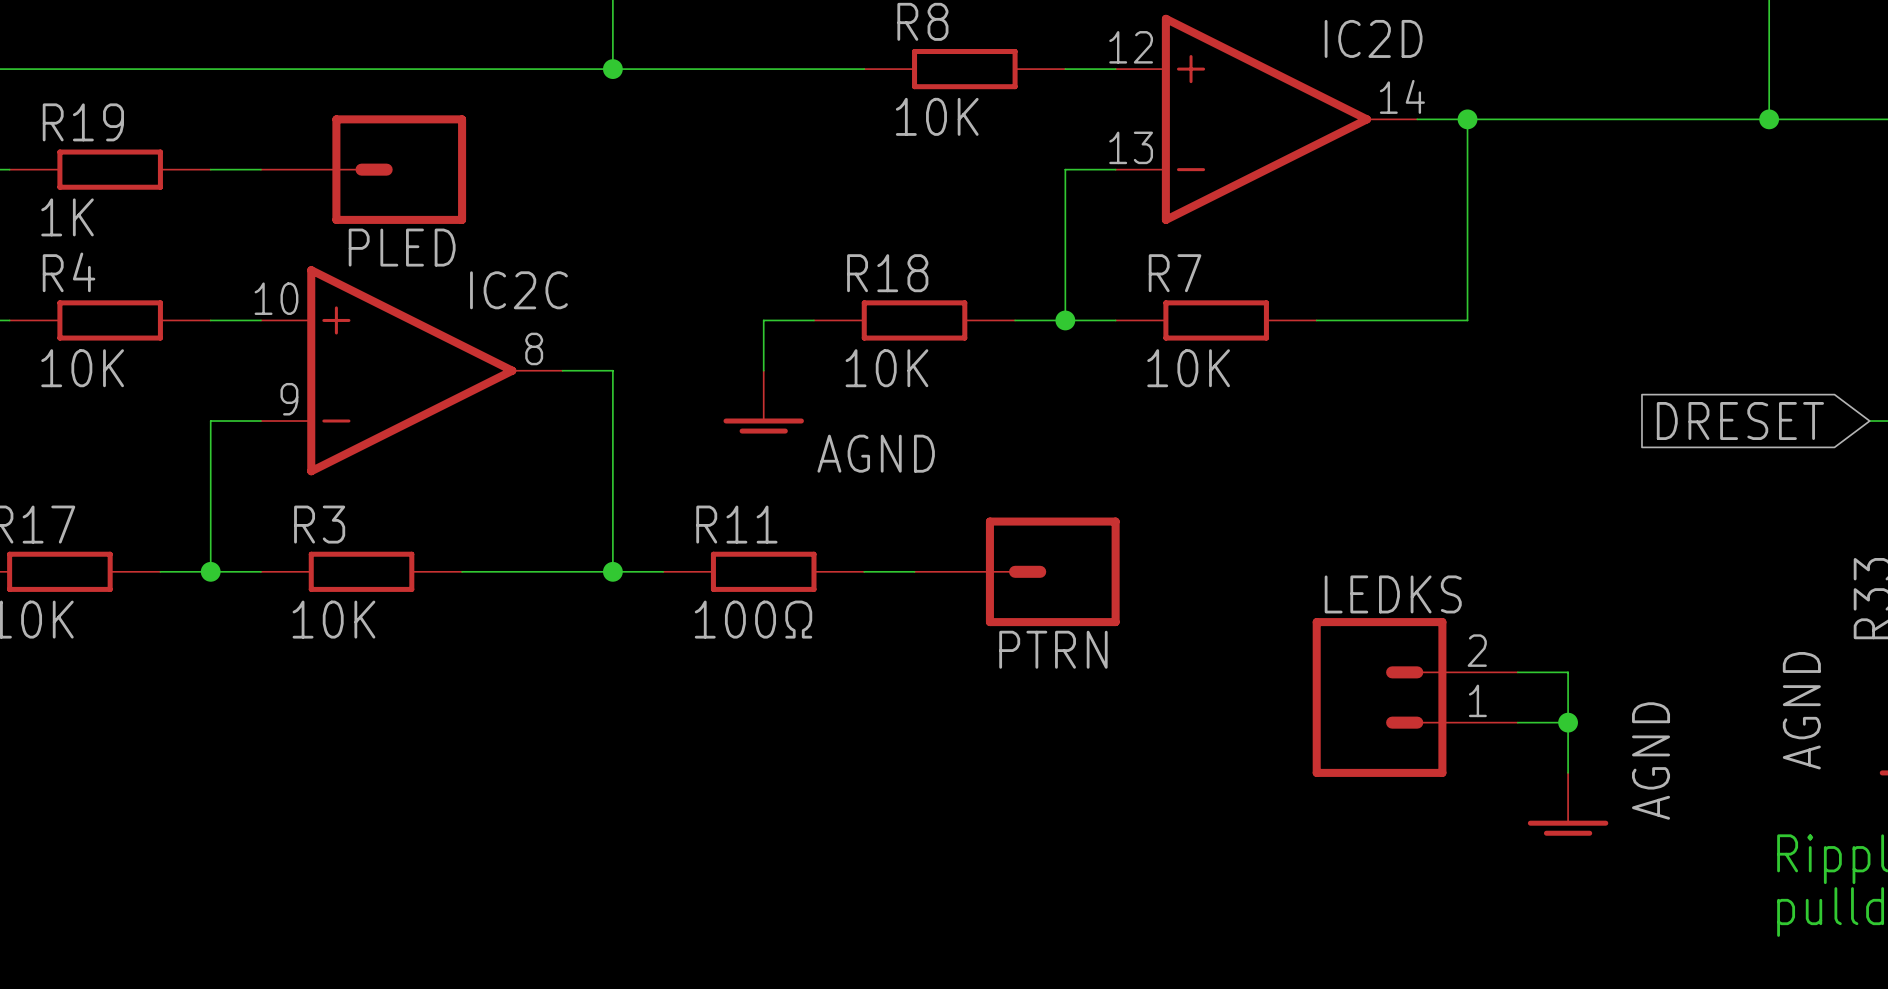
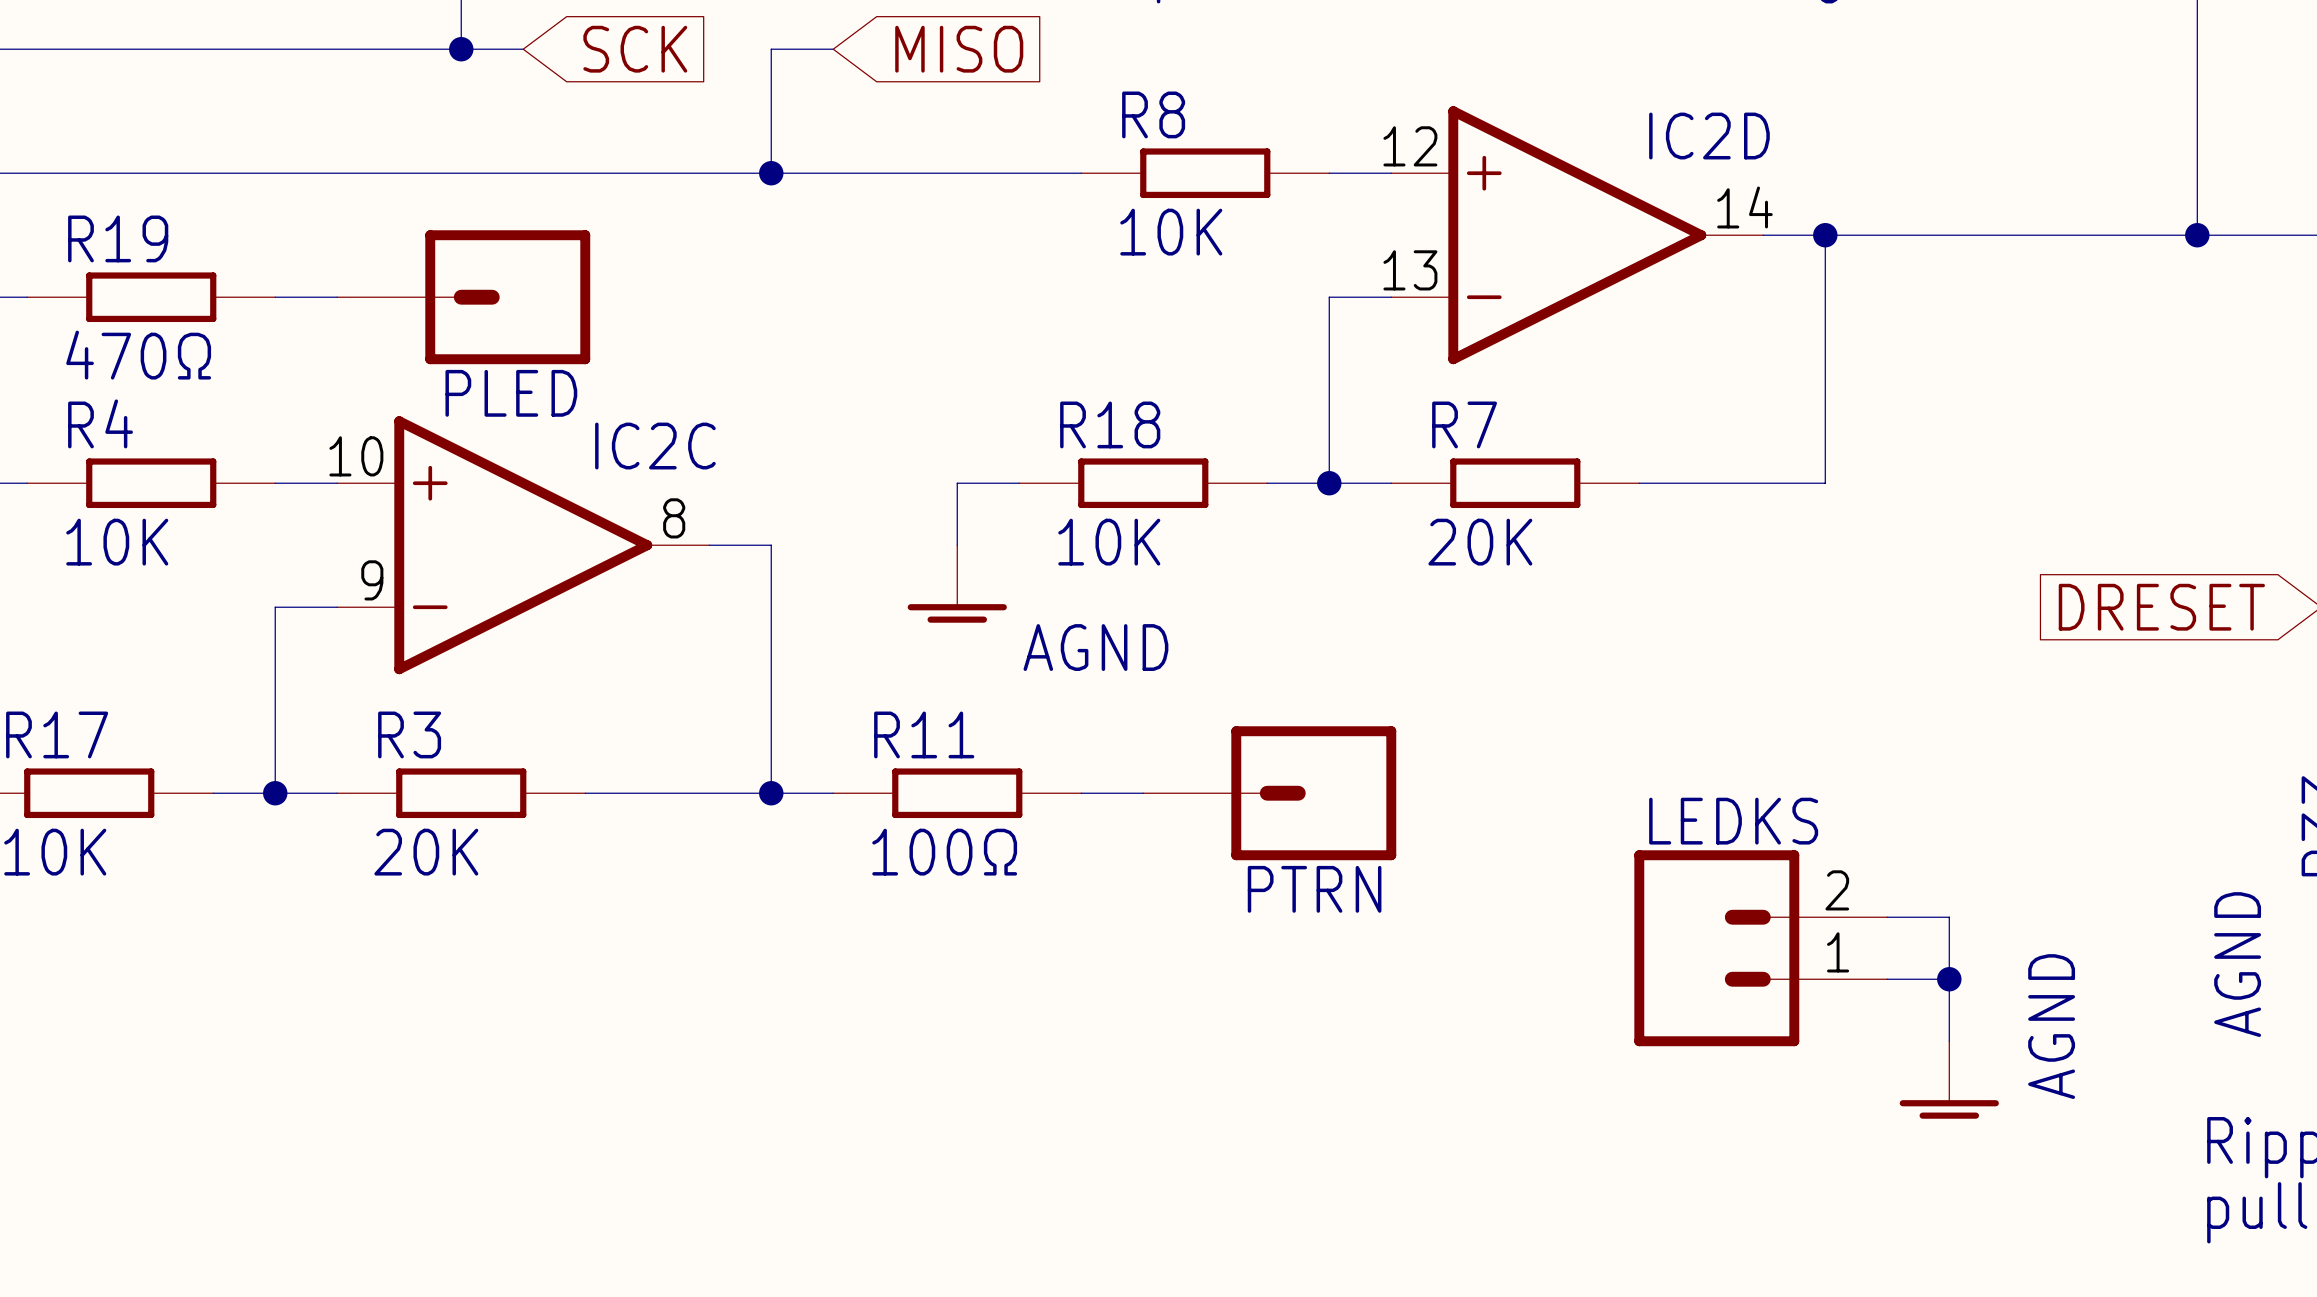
R19 value: 1K (67, 217) -> 470Ω (138, 355)
R7 value: 10K (1188, 368) -> 20K (1480, 542)
R3 value: 10K (333, 619) -> 20K (426, 852)

